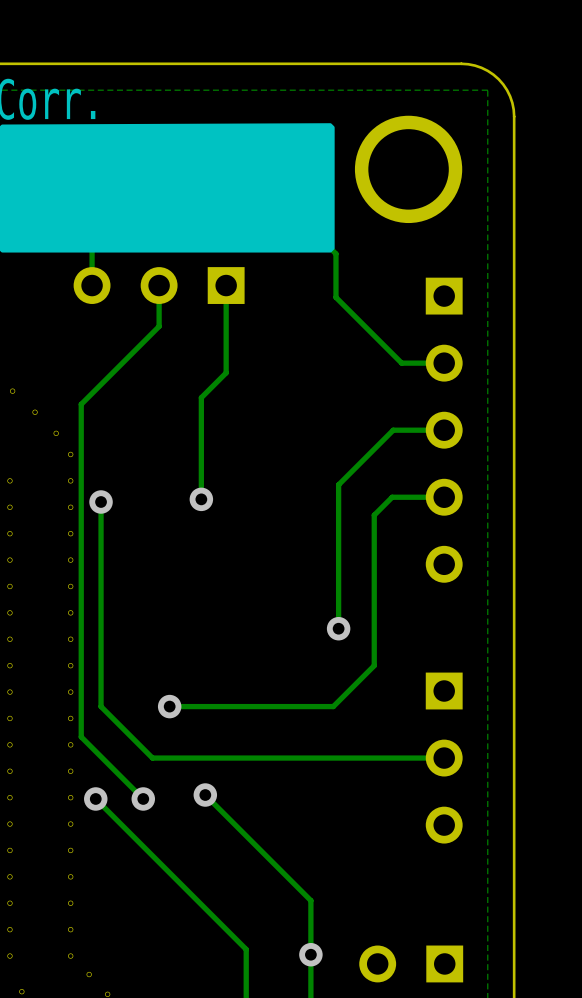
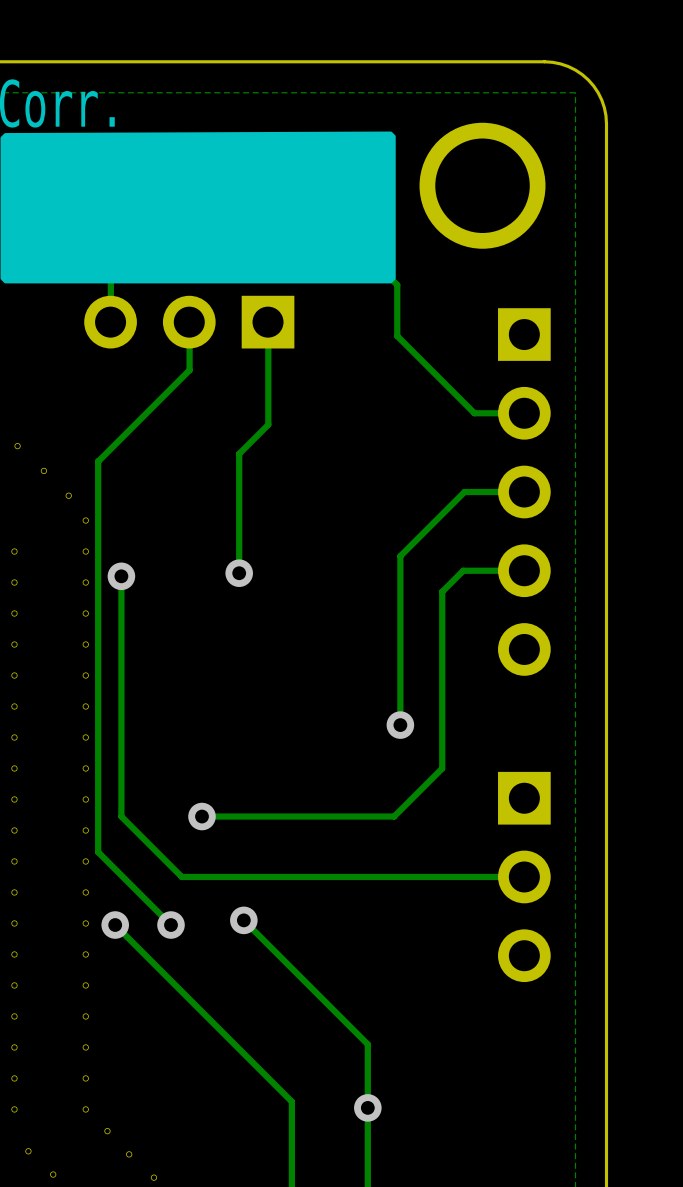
part footprint: [73, 267, 245, 304] -> [84, 295, 295, 349]
part footprint: [425, 277, 463, 583] -> [498, 308, 551, 676]
part footprint: [425, 672, 463, 844] -> [498, 771, 551, 983]
part: (411, 963) -> none

